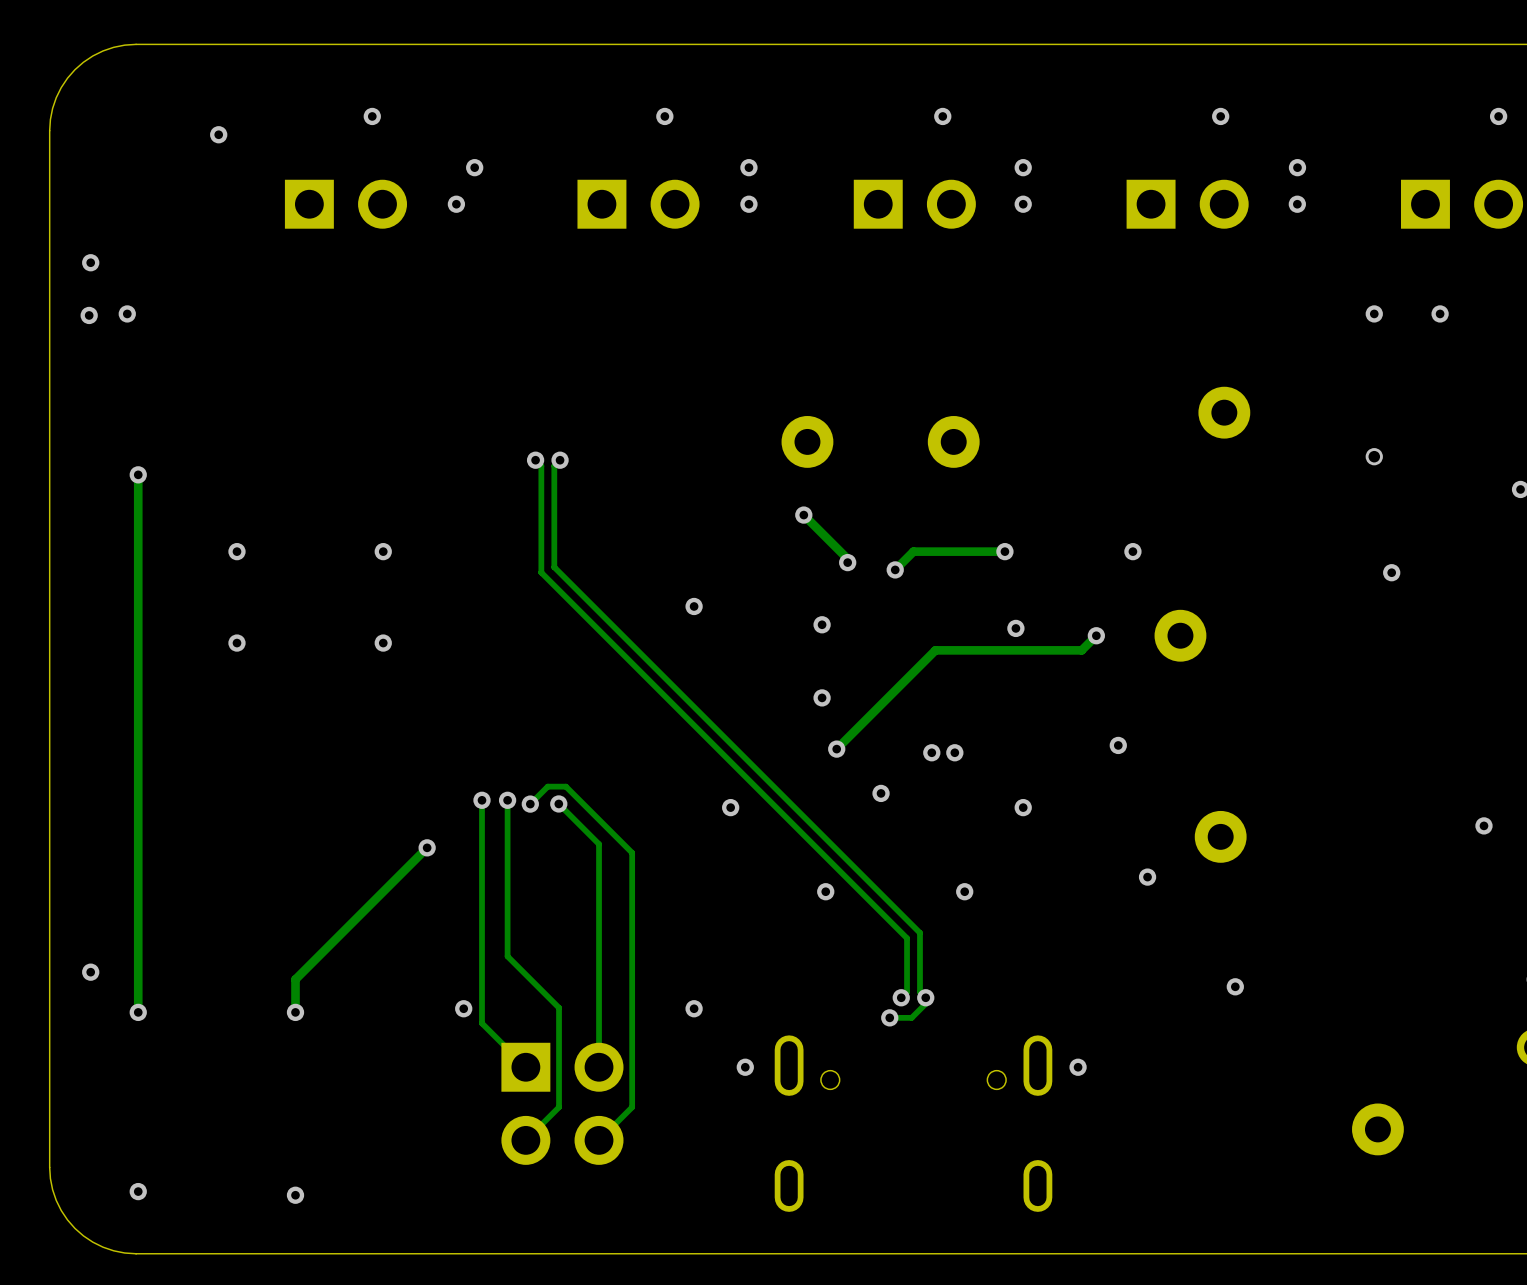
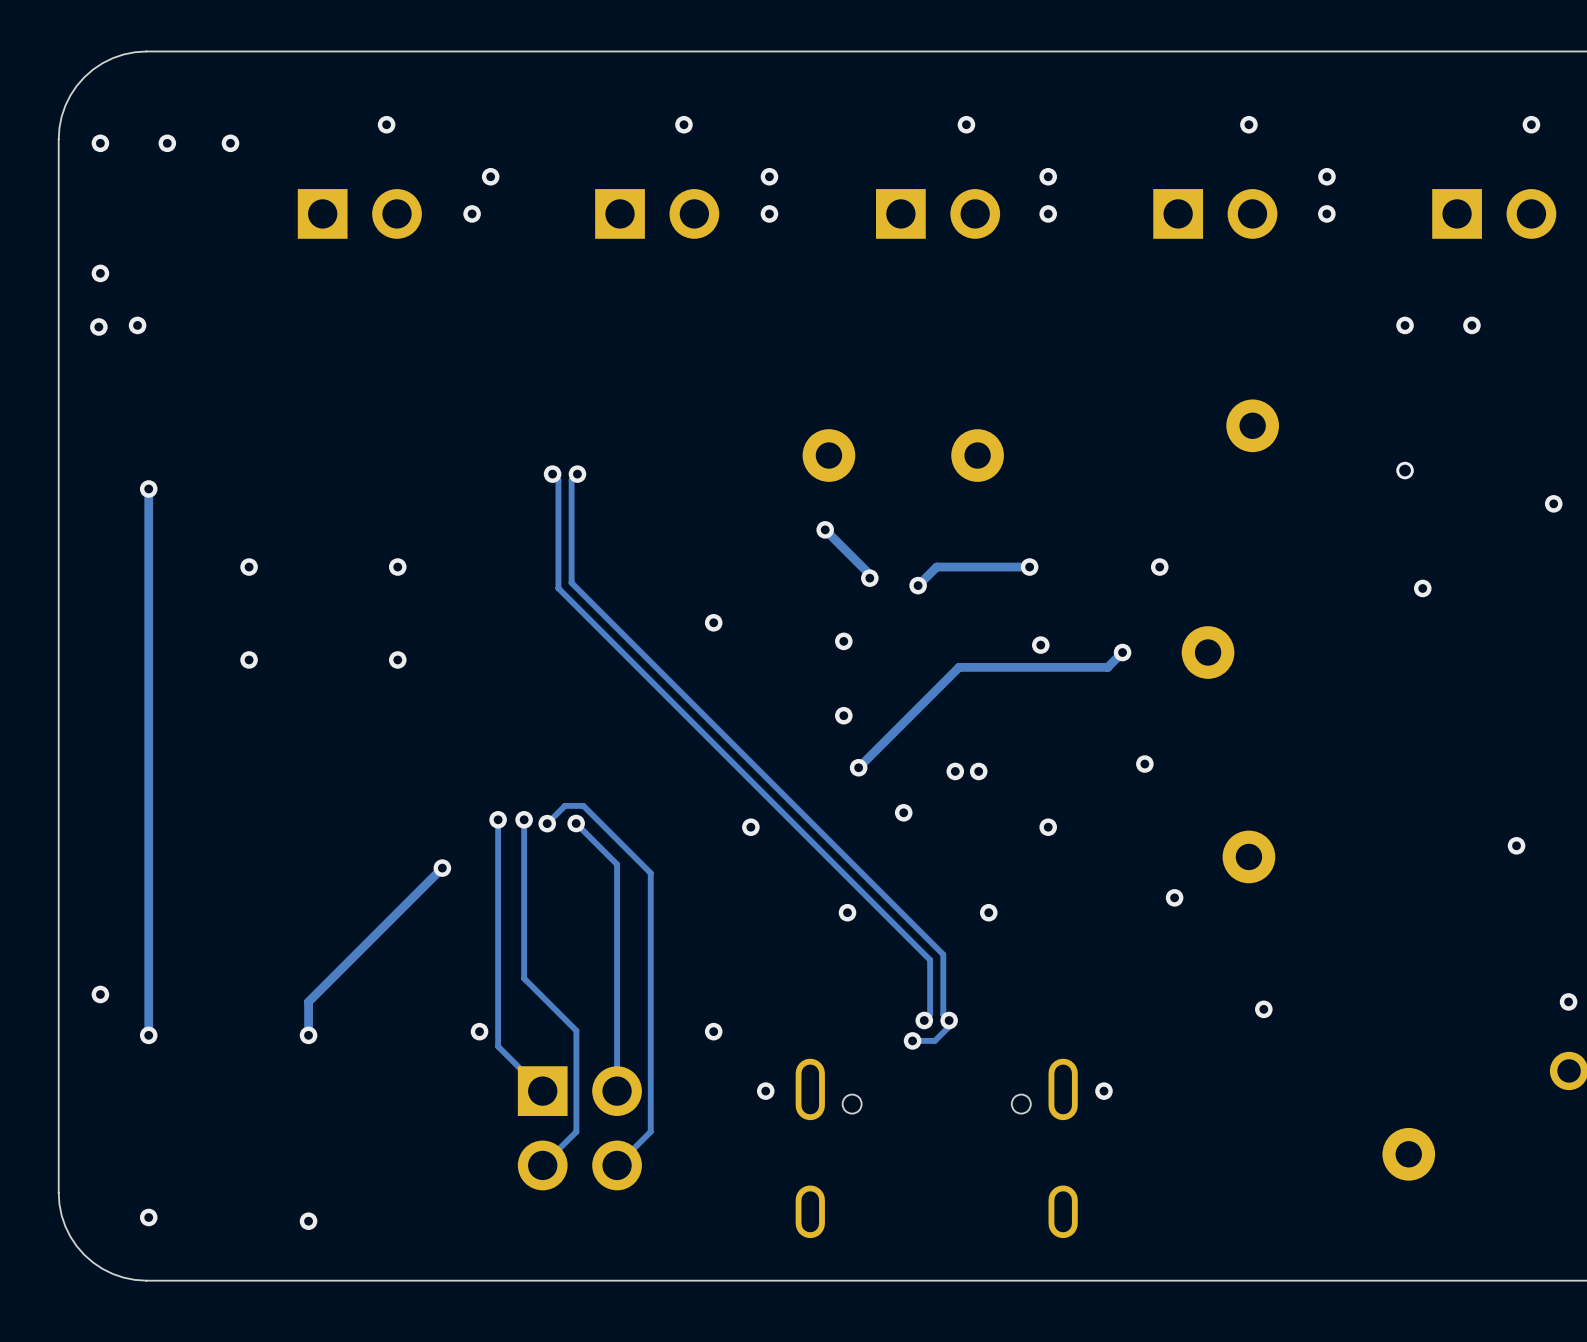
via: none -> (100, 143)
via: none -> (167, 143)

